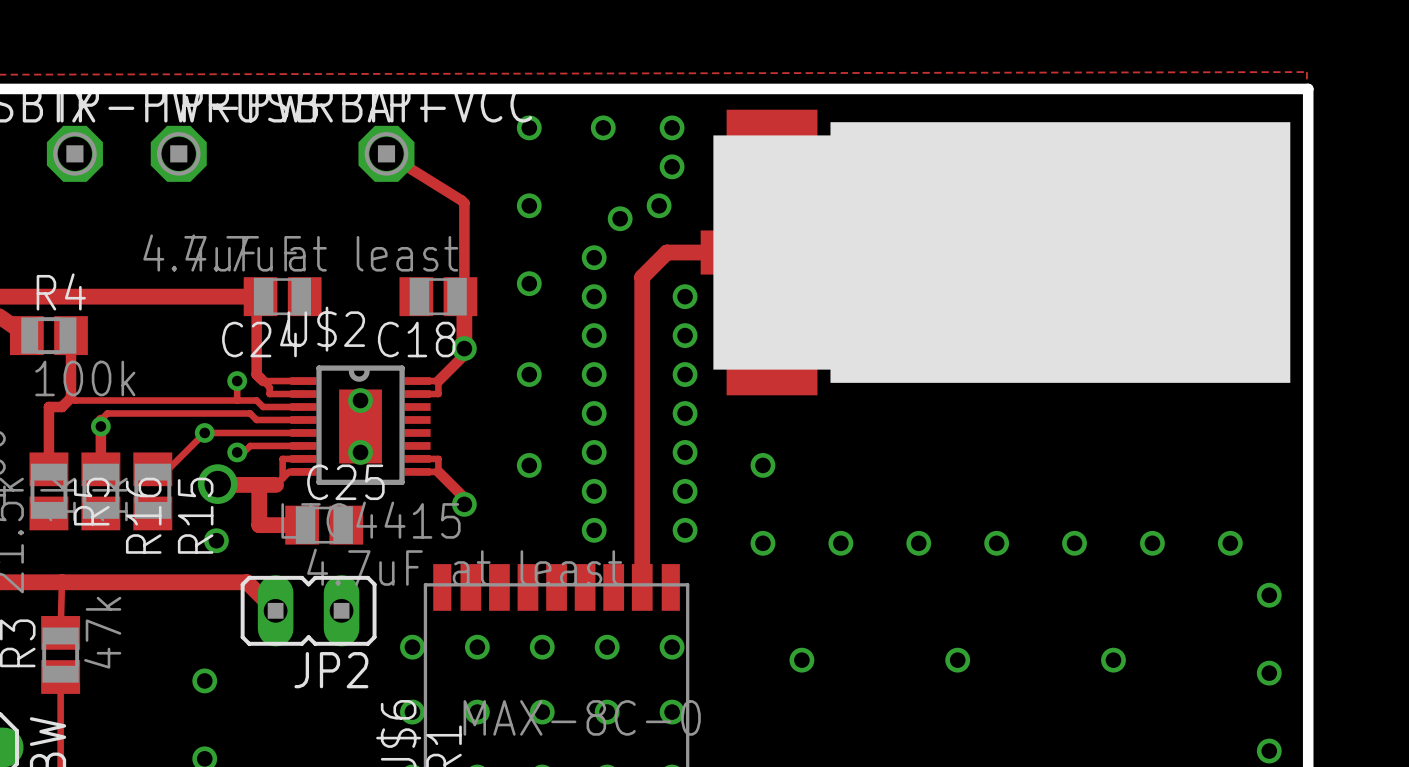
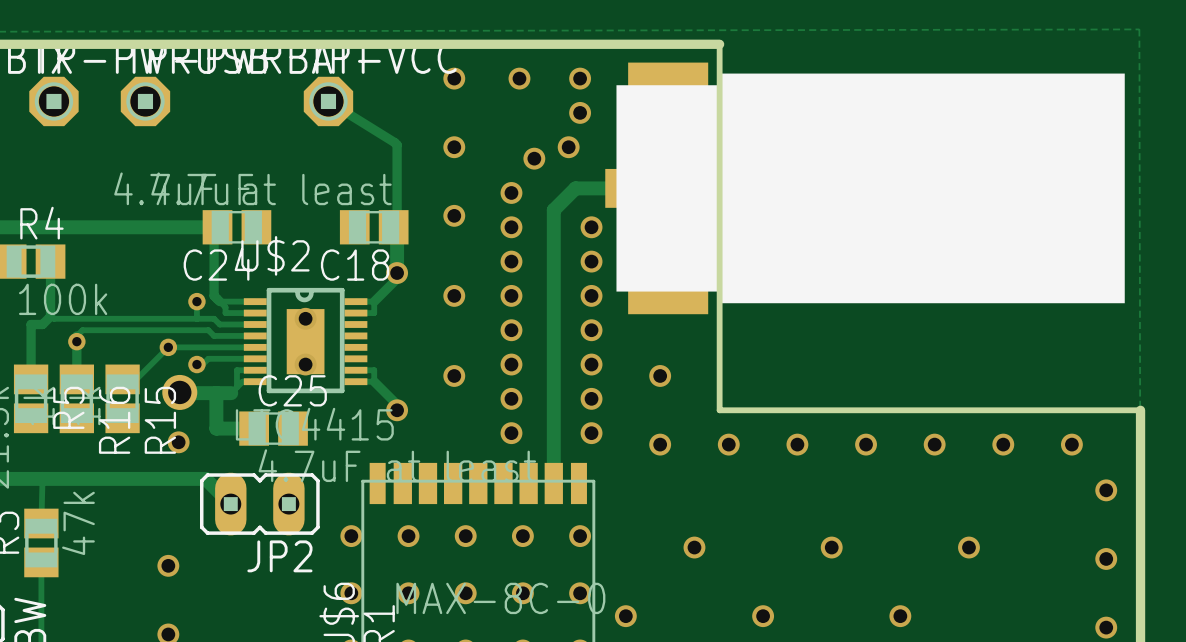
board edge: (830, 88) (1308, 88) (1308, 504) -> (719, 44) (719, 410) (1140, 410)
via: none -> (625, 616)
via: none -> (763, 616)
via: none -> (900, 616)

